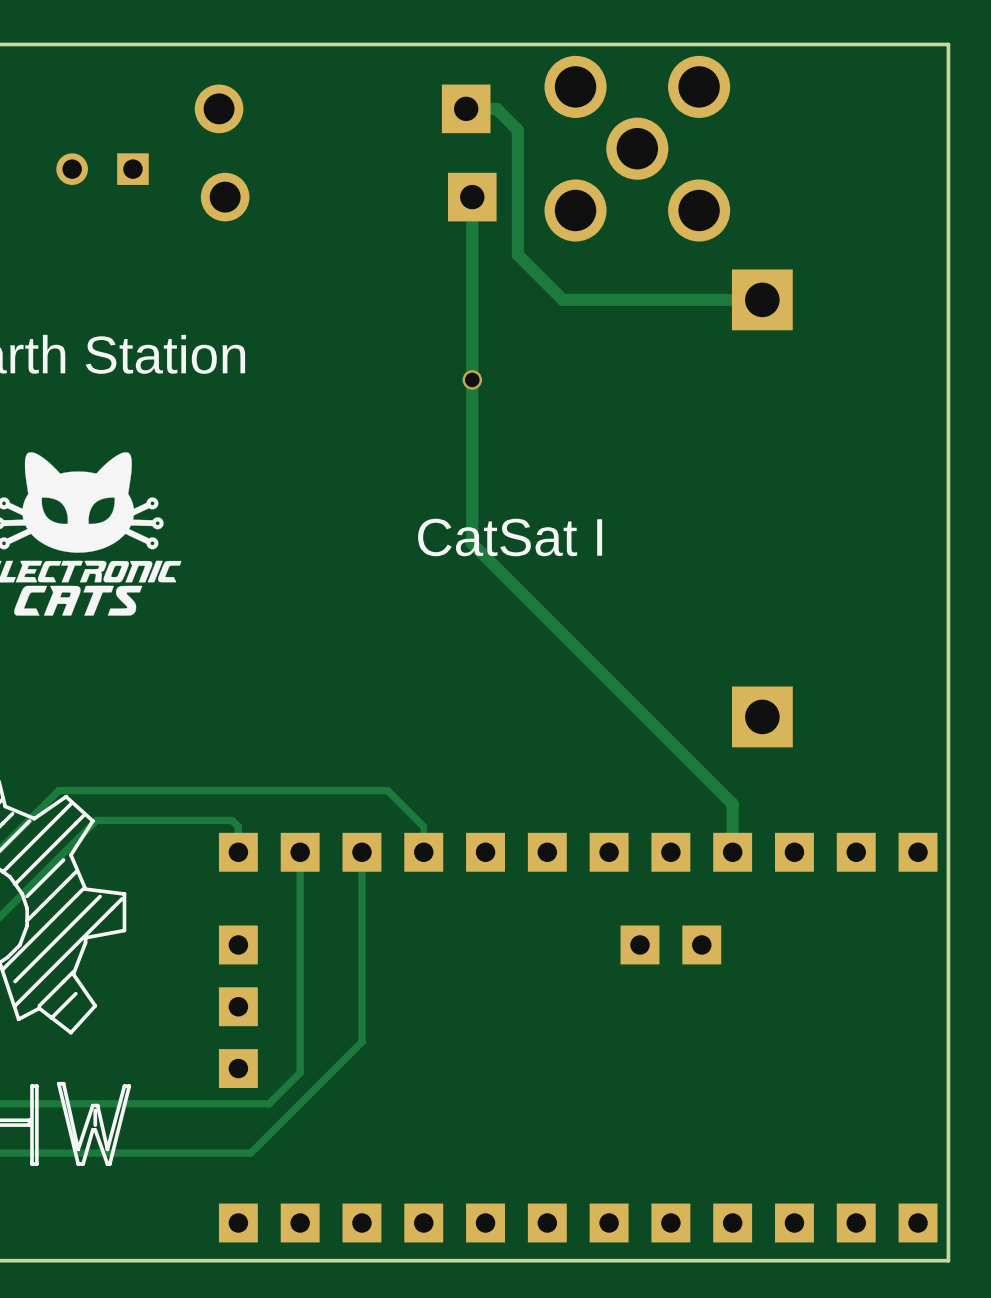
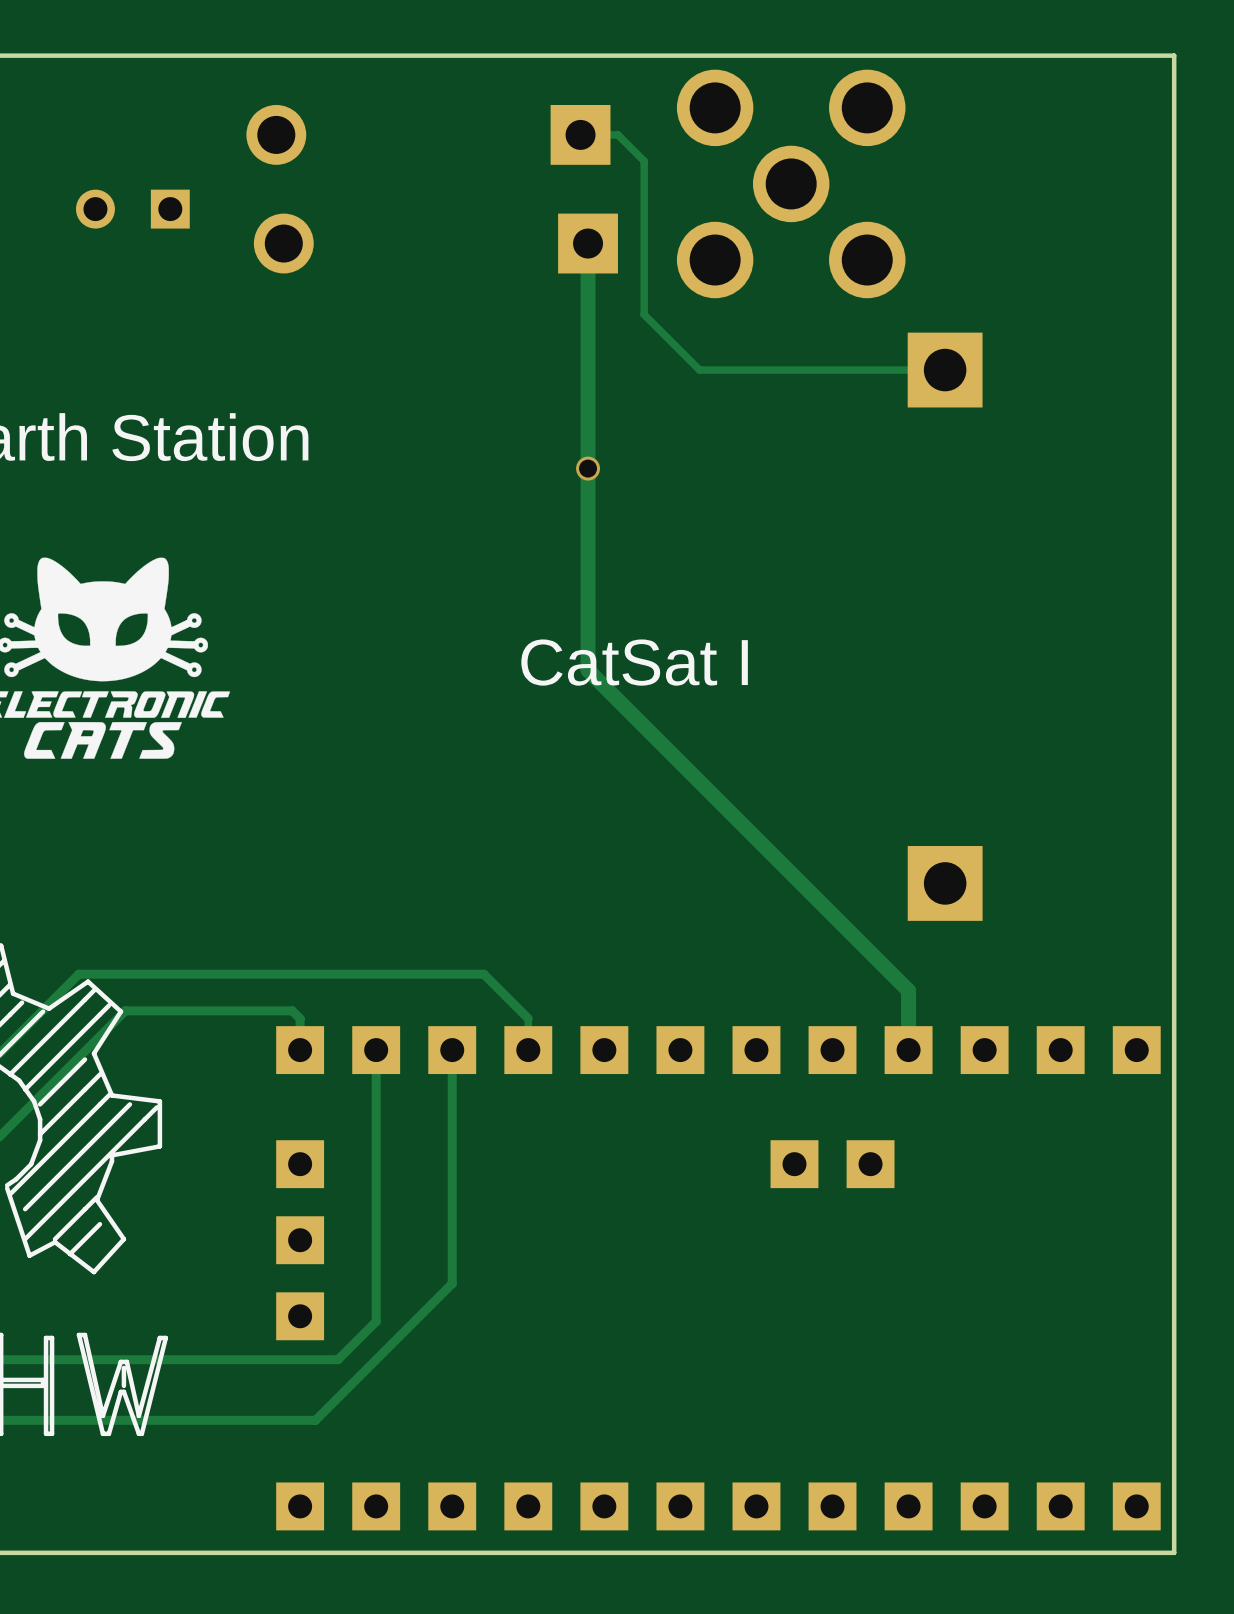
track width: thick (466, 108) (496, 108) (517, 130) (517, 254) (562, 299) (762, 299) -> thin (580, 134) (617, 134) (644, 161) (644, 314) (699, 370) (945, 370)

